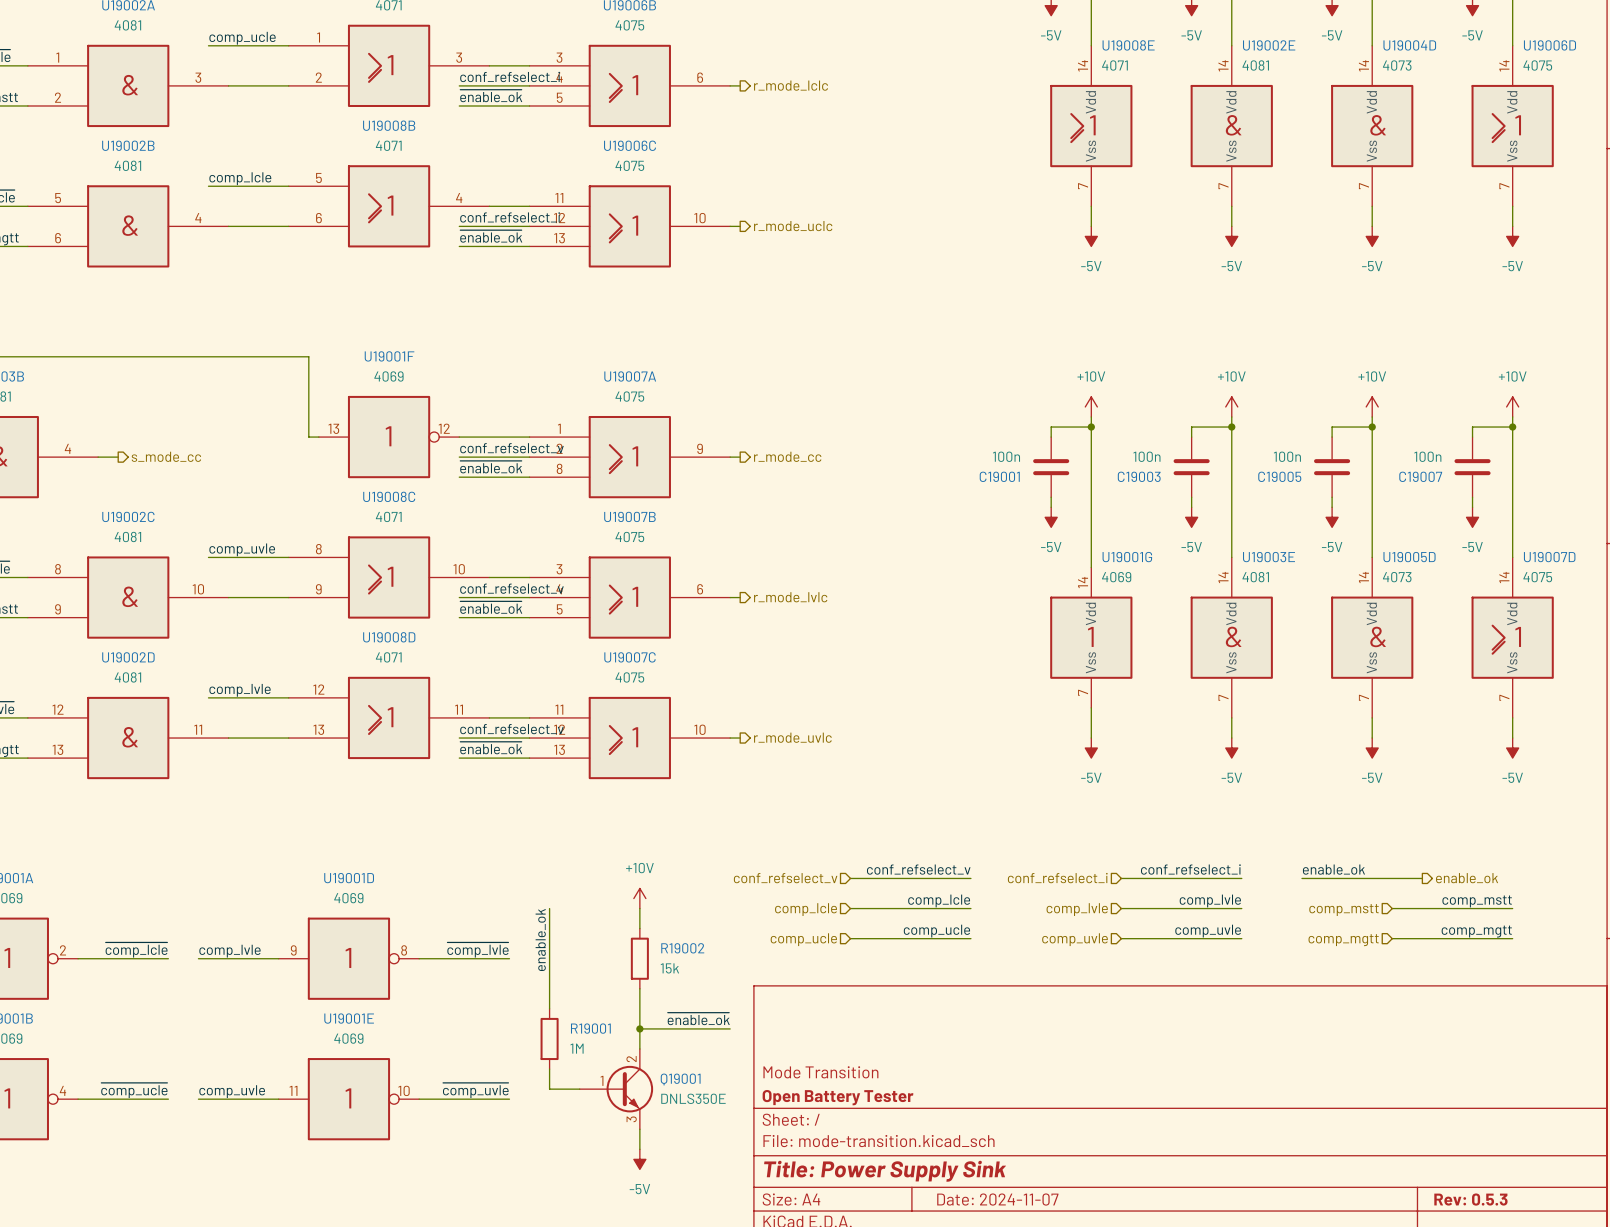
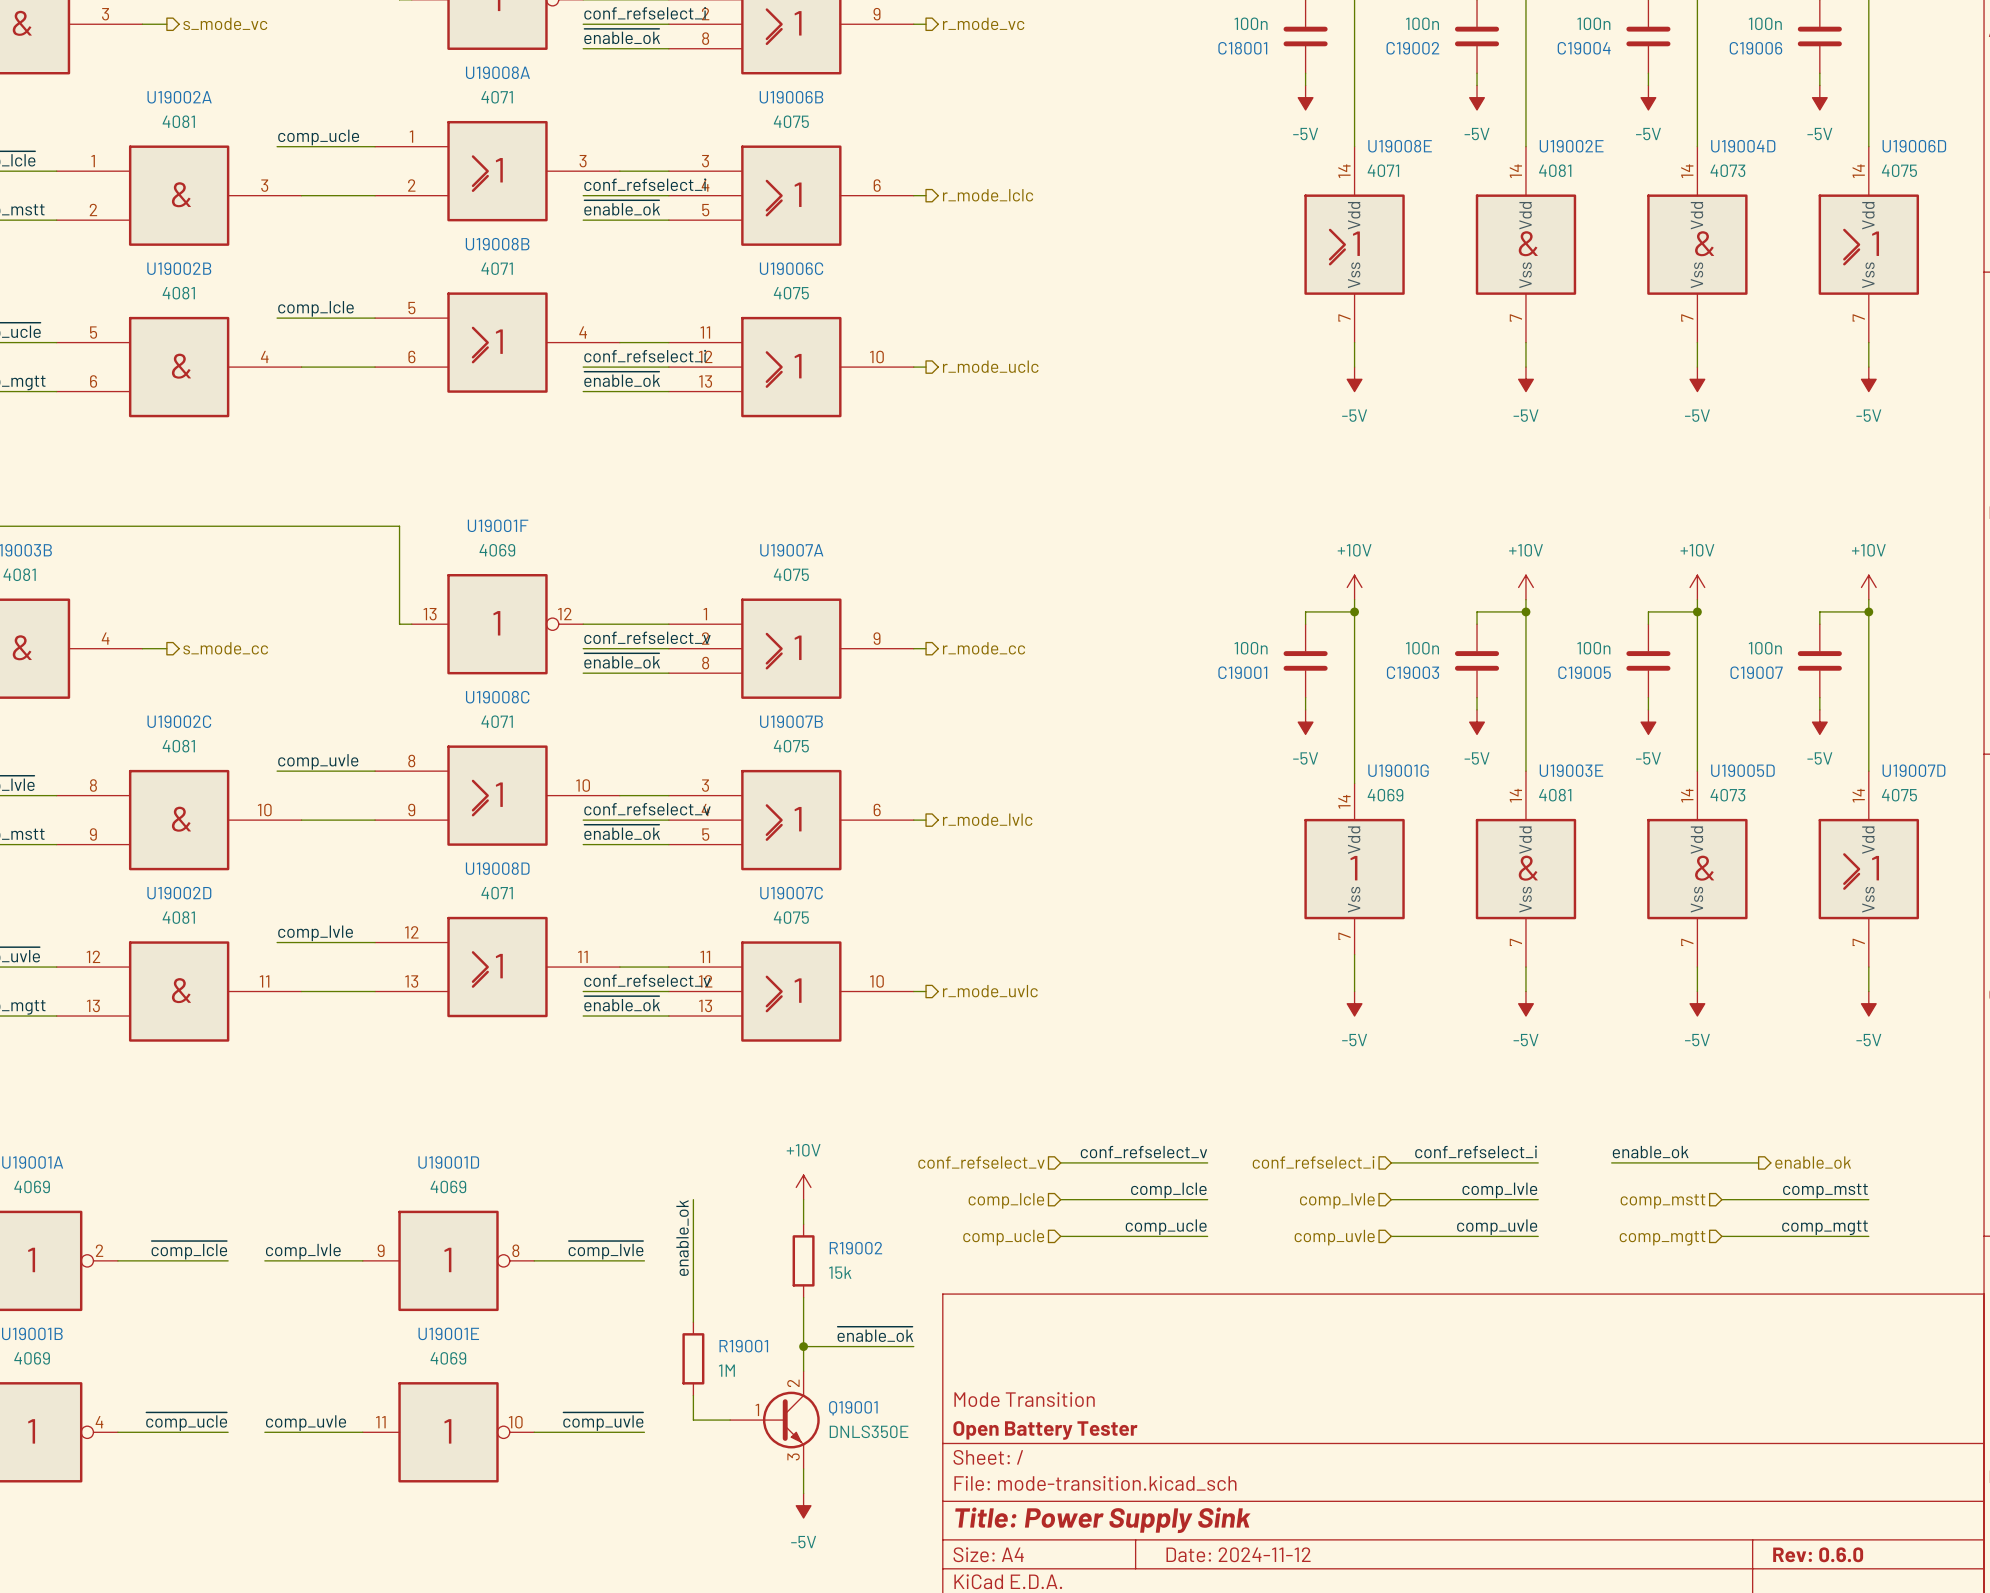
title block: Date: 2024-11-07 (997, 1199) -> Date: 2024-11-12 (1238, 1554)
title block: Rev: 0.5.3 (1470, 1199) -> Rev: 0.6.0 (1818, 1554)

